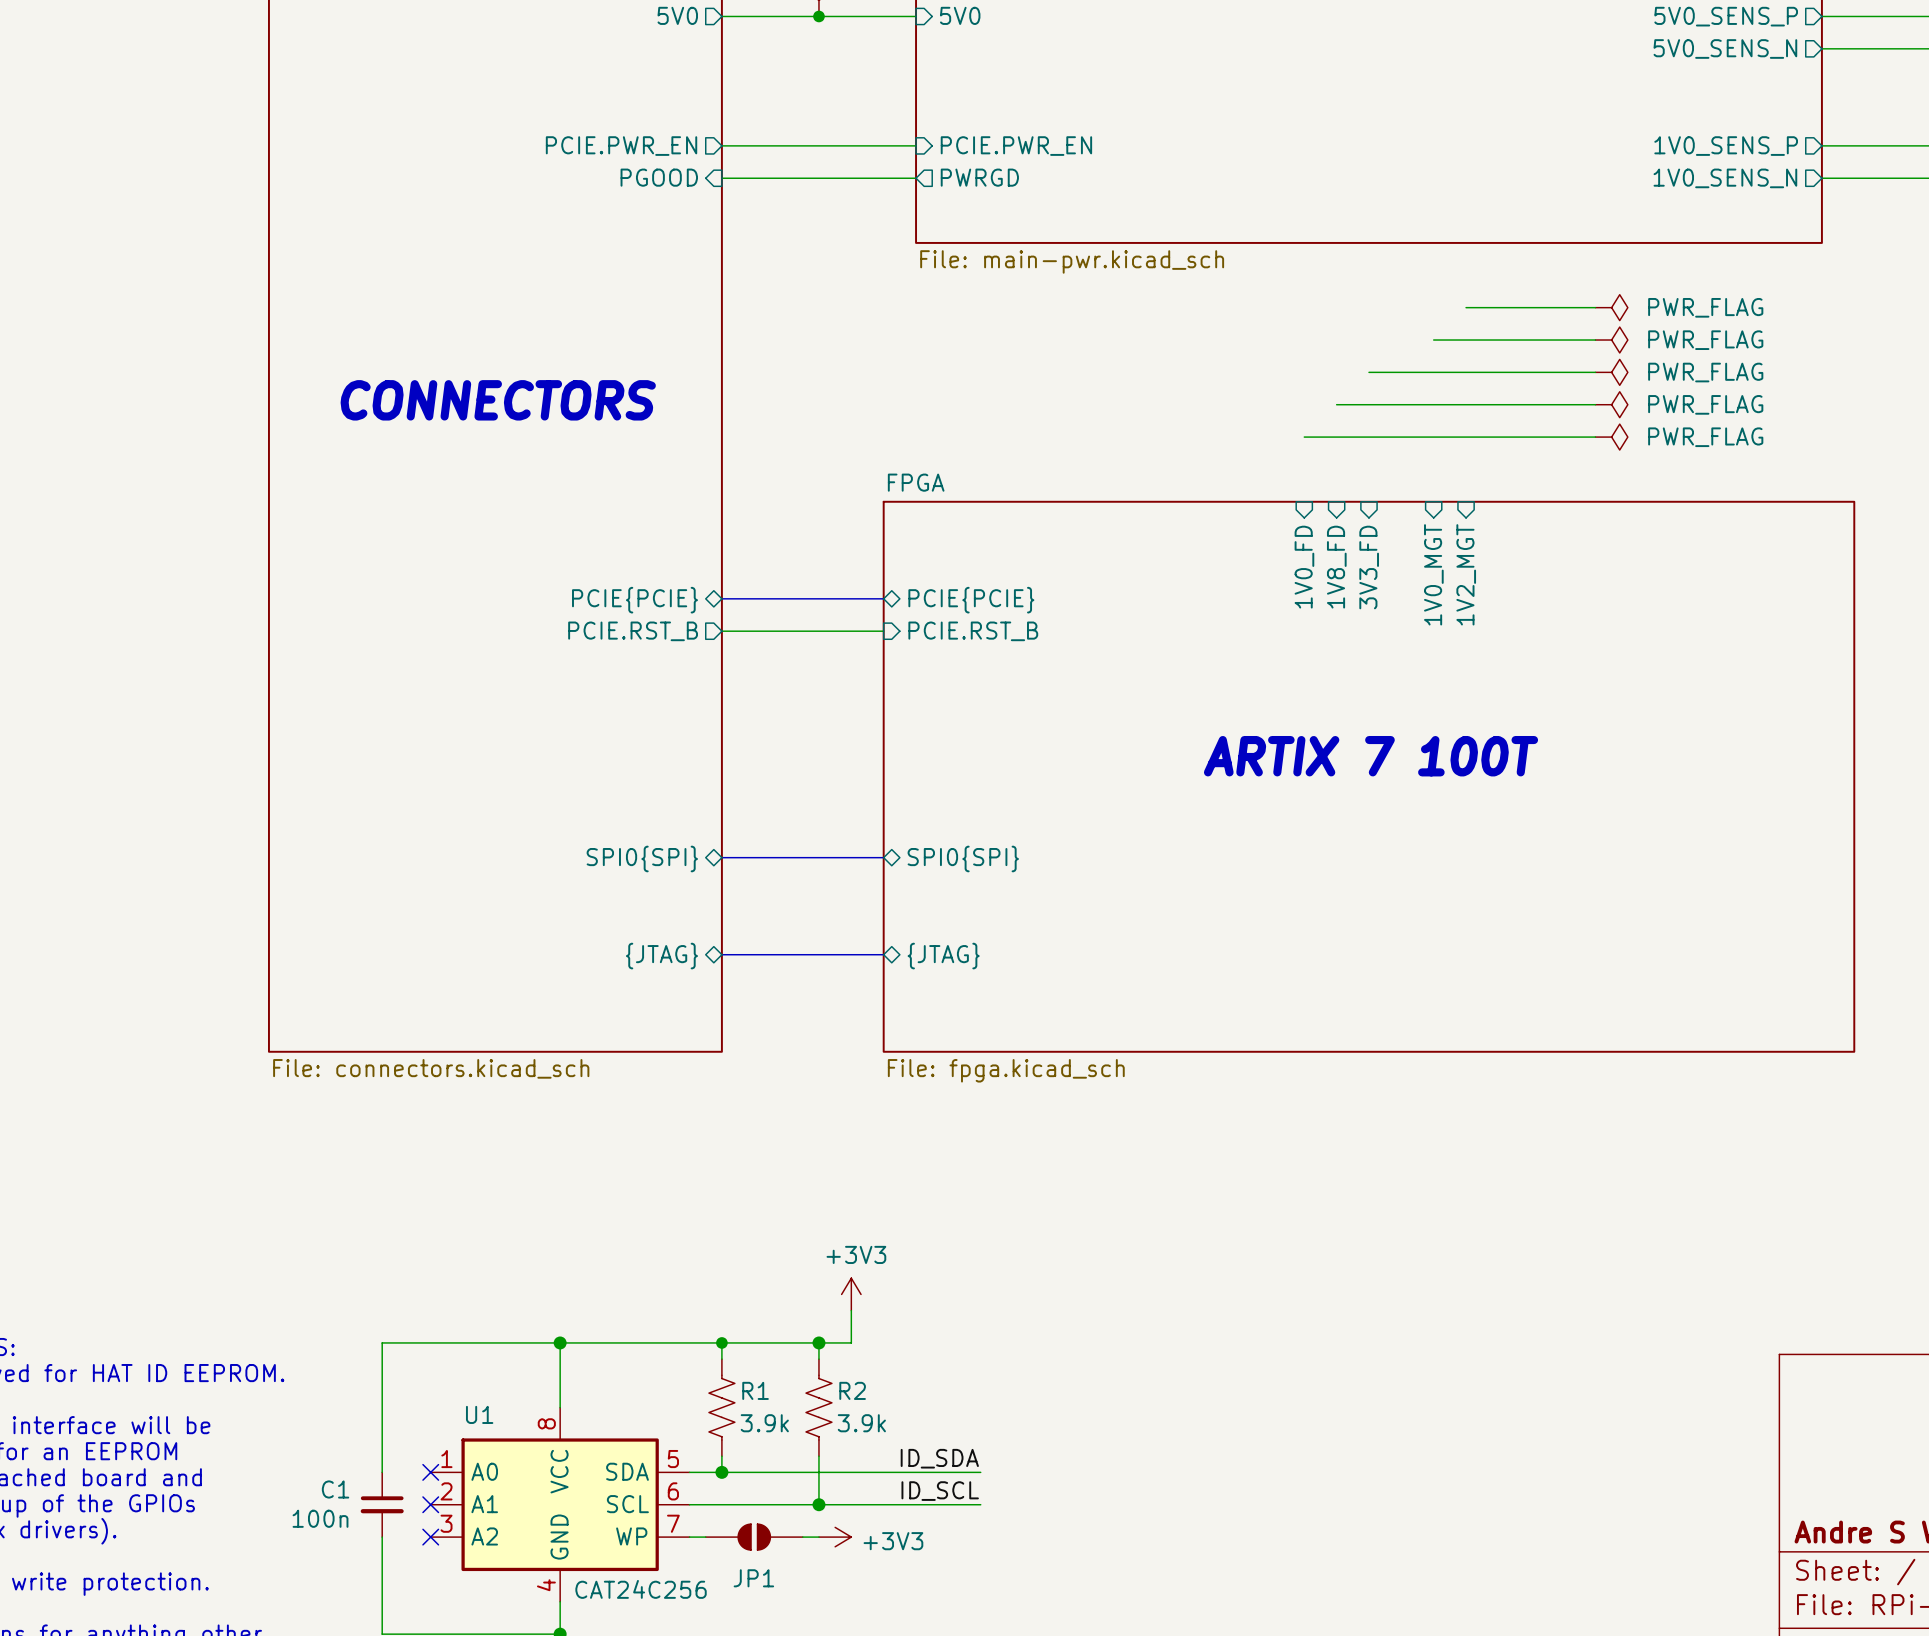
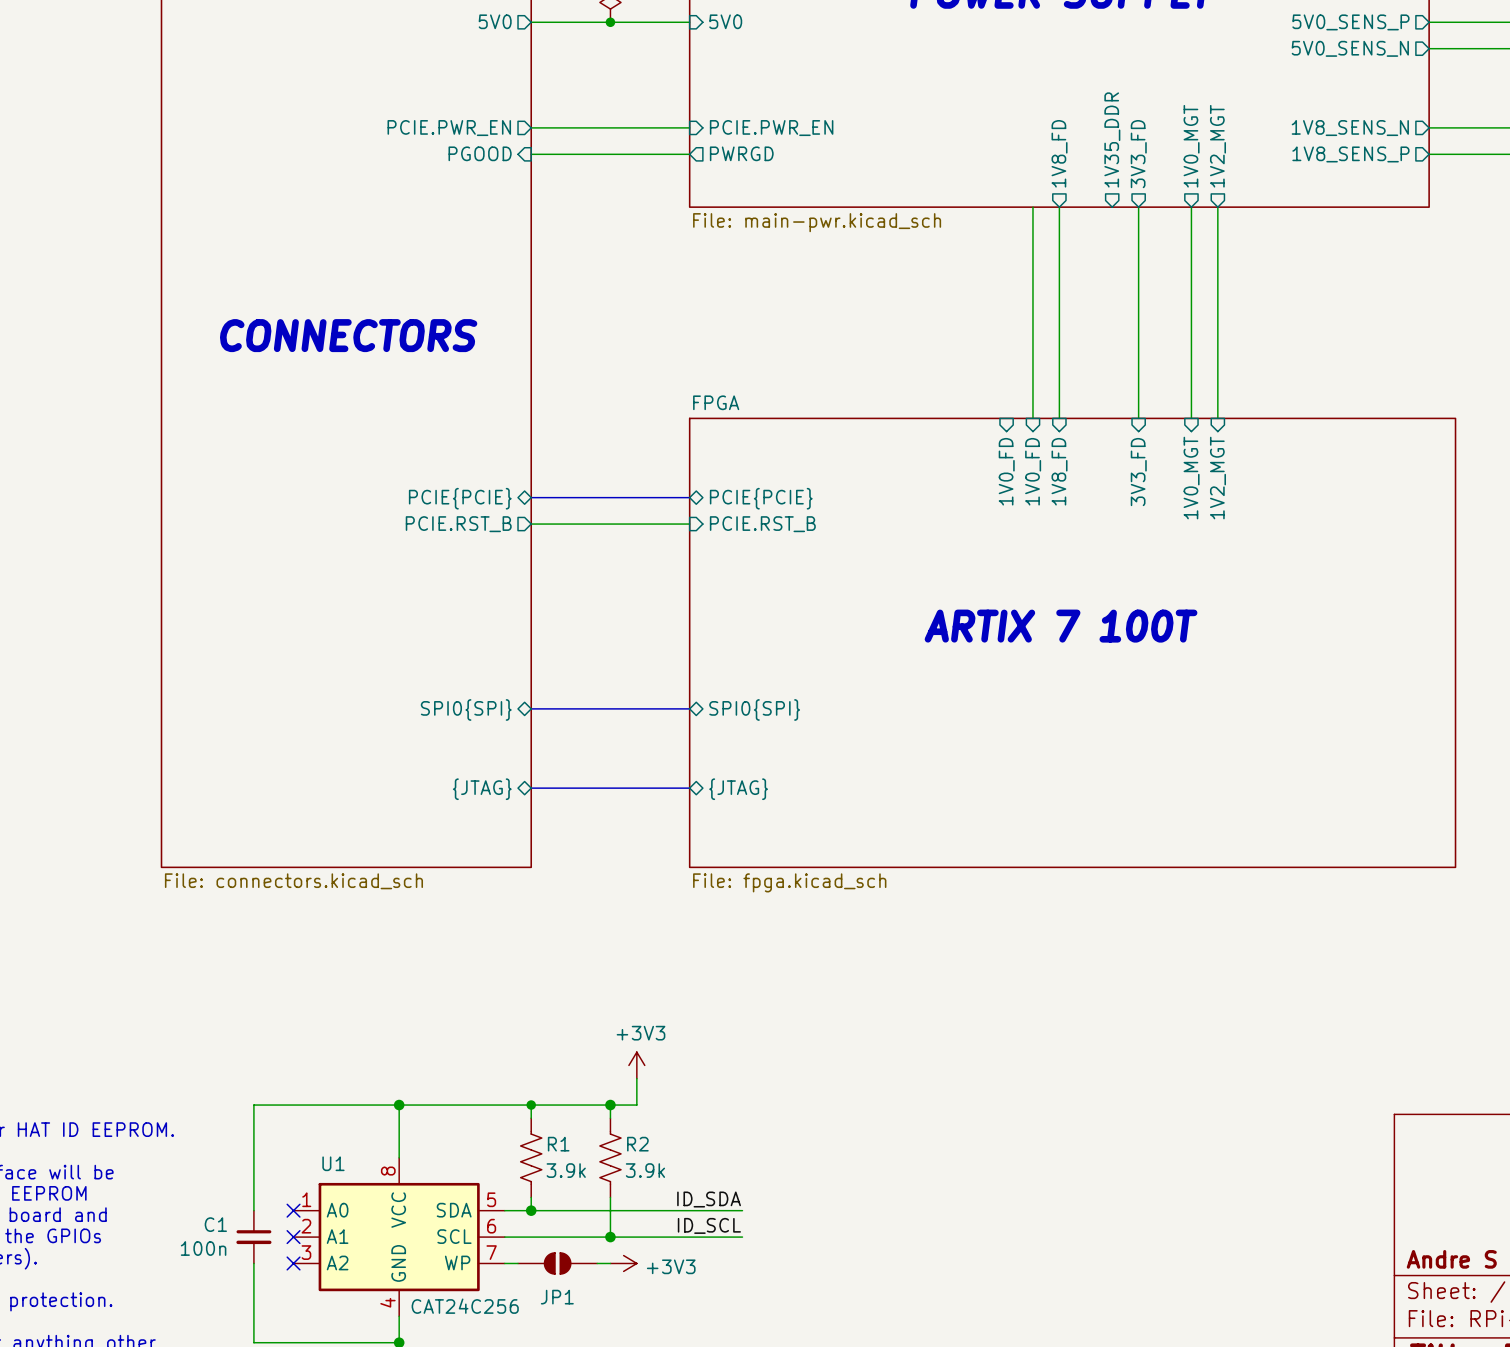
sheet pin: 1V0_SENS_P (1726, 146) -> 1V8_SENS_N (1350, 128)
sheet pin: none -> 1V35_DDR (1112, 139)
sheet pin: none -> 1V0_MGT (1191, 146)
sheet pin: none -> 1V2_MGT (1217, 146)
sheet pin: none -> 1V8_FD (1059, 153)
sheet pin: none -> 3V3_FD (1138, 154)
sheet pin: 1V0_SENS_N (1725, 178) -> 1V8_SENS_P (1350, 154)
wire: none -> (1032, 207) (1032, 418)
wire: none -> (1059, 207) (1059, 418)
wire: none -> (1138, 207) (1138, 418)
wire: none -> (1191, 207) (1191, 418)
wire: none -> (1217, 207) (1217, 418)
wire: (1466, 307) (1595, 307) -> none
power symbol: PWR_FLAG (1611, 307) -> none
wire: (1433, 340) (1595, 340) -> none
power symbol: PWR_FLAG (1611, 340) -> none
wire: (1368, 372) (1595, 372) -> none
power symbol: PWR_FLAG (1611, 372) -> none
wire: (1336, 404) (1595, 404) -> none
power symbol: PWR_FLAG (1611, 404) -> none
wire: (1304, 437) (1595, 437) -> none
power symbol: PWR_FLAG (1611, 437) -> none
sheet pin: 1V8_FD (1336, 567) -> 1V0_FD (1033, 471)
sheet pin: 3V3_FD (1369, 567) -> 1V8_FD (1059, 471)
sheet pin position: 1V0_MGT (1433, 574) -> 1V0_MGT (1191, 478)
sheet pin: 1V2_MGT (1466, 574) -> 3V3_FD (1138, 472)
sheet pin: none -> 1V2_MGT (1217, 478)
bus: none -> (663, 497) (689, 497)
sheet pin position: PCIE{PCIE} (971, 600) -> PCIE{PCIE} (761, 498)
wire: none -> (663, 524) (689, 524)
sheet pin position: PCIE.RST_B (973, 631) -> PCIE.RST_B (762, 524)
sheet FPGA: File: fpga.kicad_sch (1368, 776) -> none
sheet FPGA: none -> File: fpga.kicad_sch (1072, 642)
bus: none -> (663, 708) (689, 708)
sheet pin position: SPI0{SPI} (963, 858) -> SPI0{SPI} (754, 709)
bus: none -> (663, 788) (689, 788)
sheet pin position: {JTAG} (943, 956) -> {JTAG} (738, 789)

